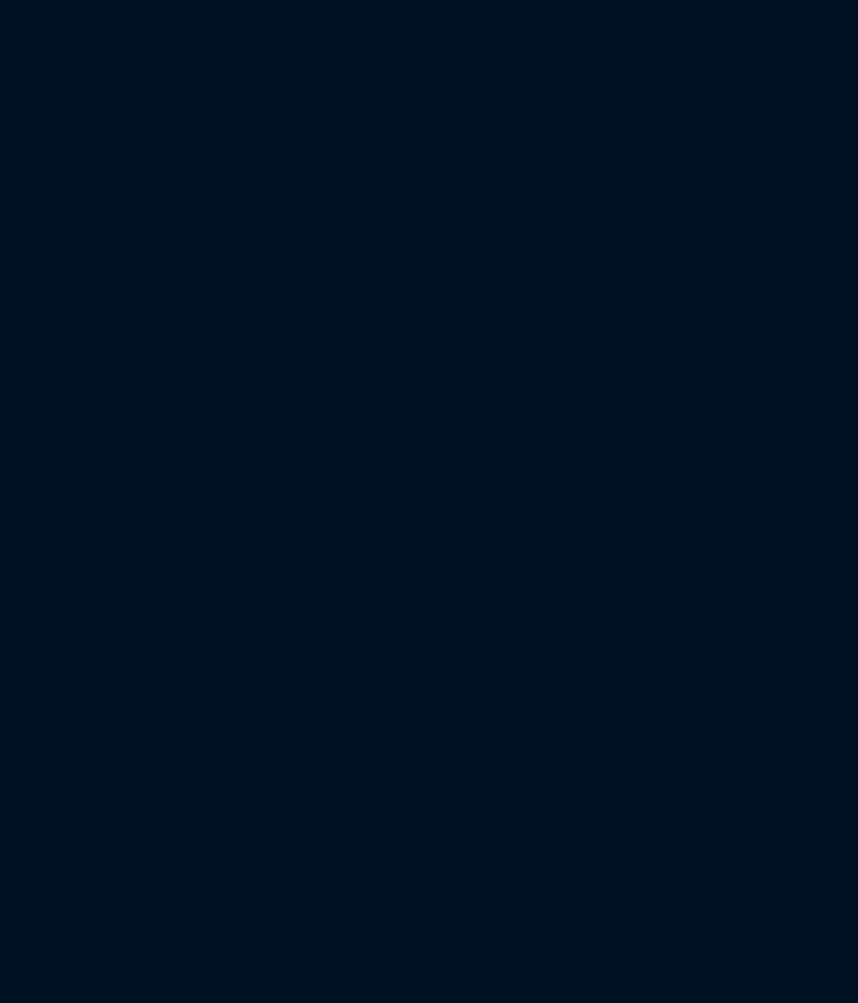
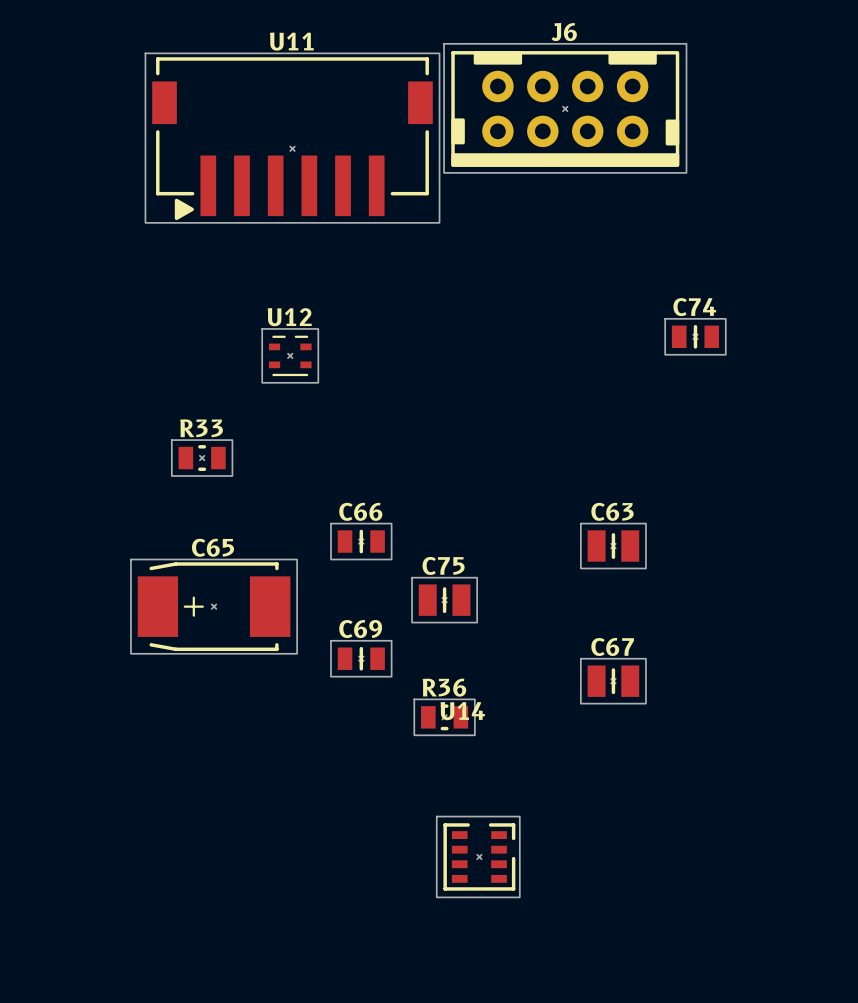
J6: none -> (565, 108)
U11: none -> (292, 138)
C74: none -> (695, 336)
U12: none -> (290, 355)
R33: none -> (202, 458)
C66: none -> (361, 541)
C63: none -> (613, 546)
C75: none -> (444, 600)
C65: none -> (214, 606)
C69: none -> (361, 658)
C67: none -> (613, 681)
R36: none -> (444, 717)
U14: none -> (478, 856)

